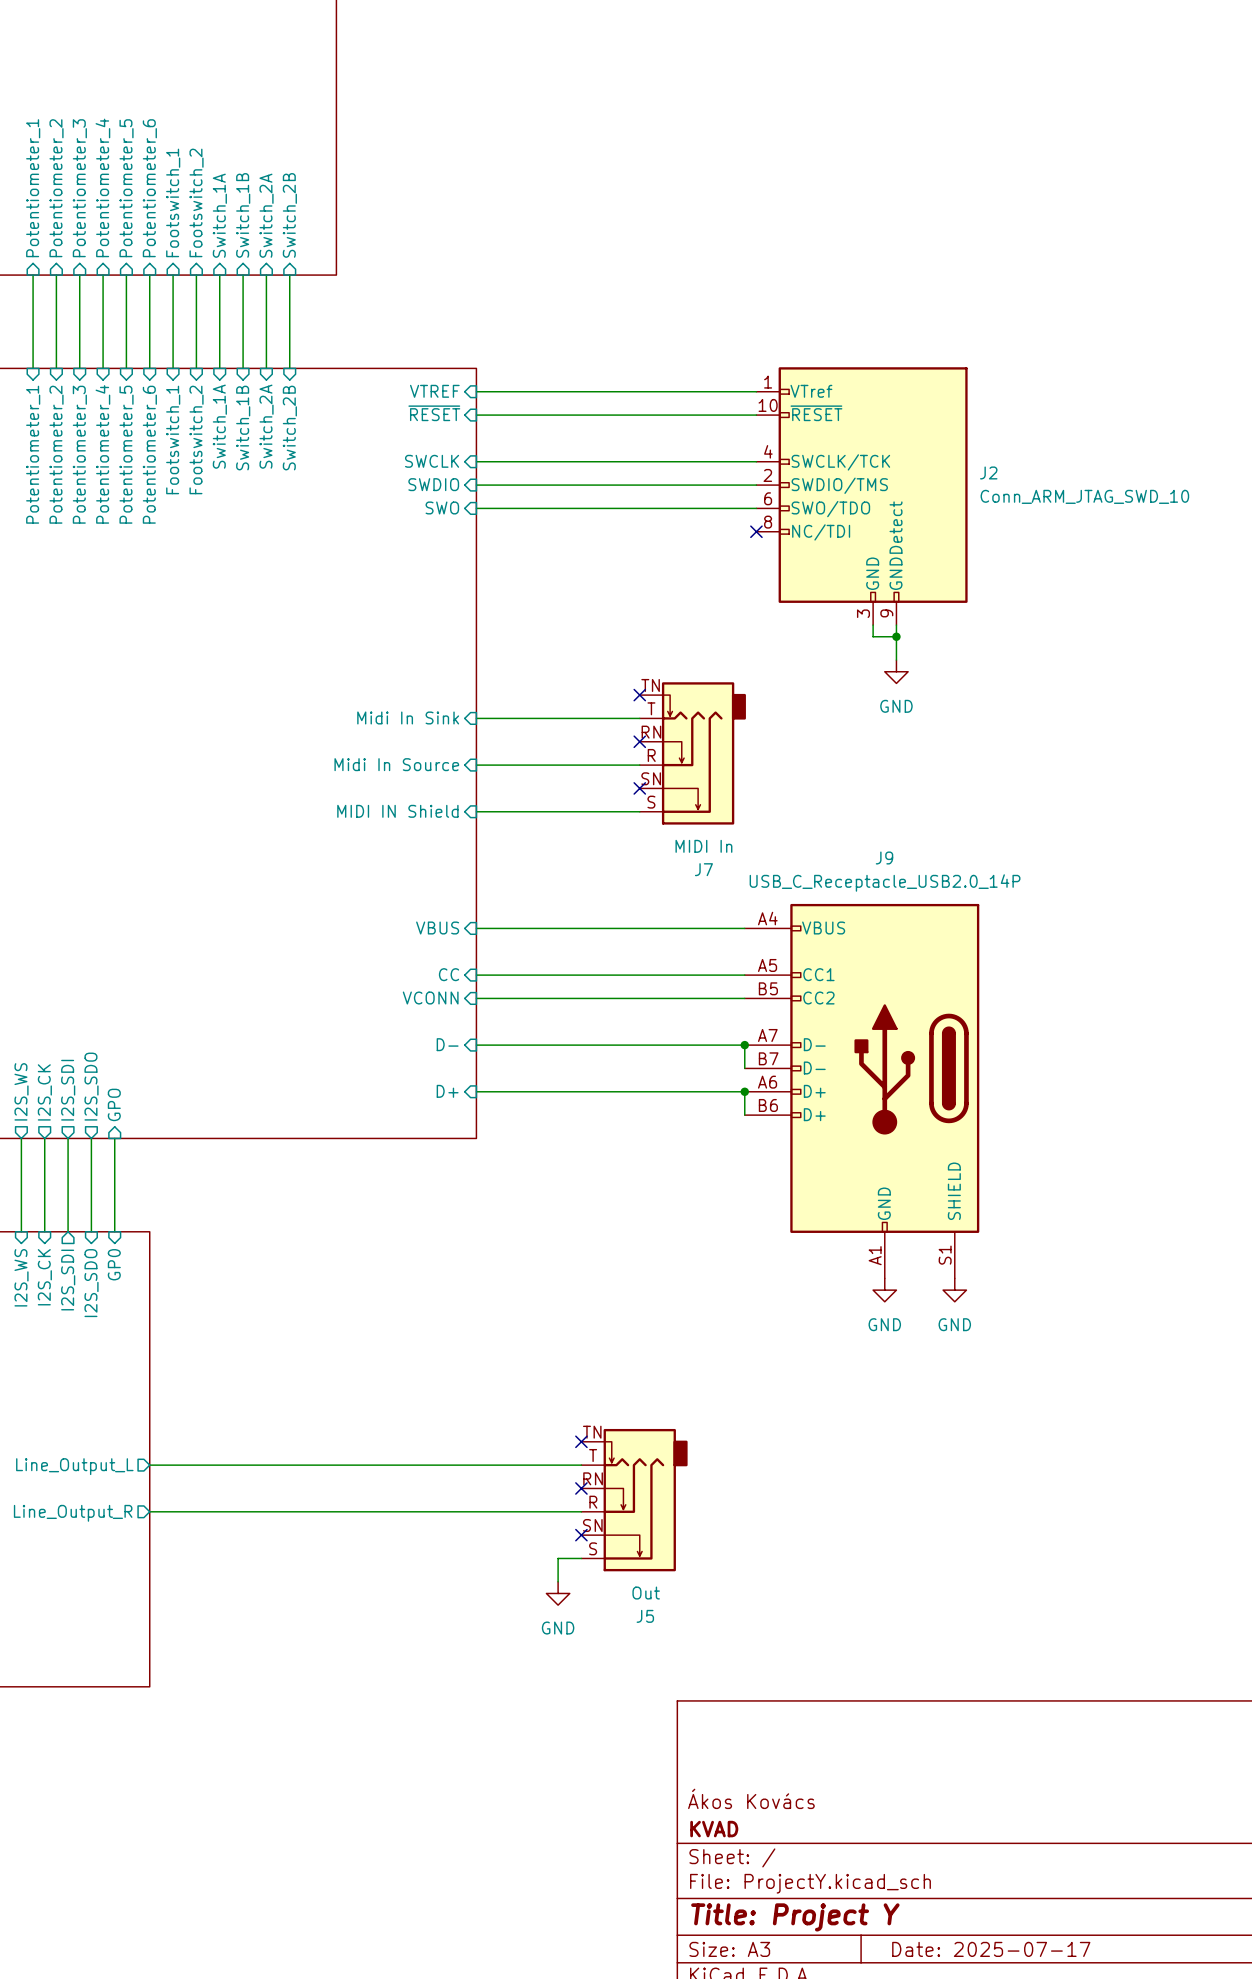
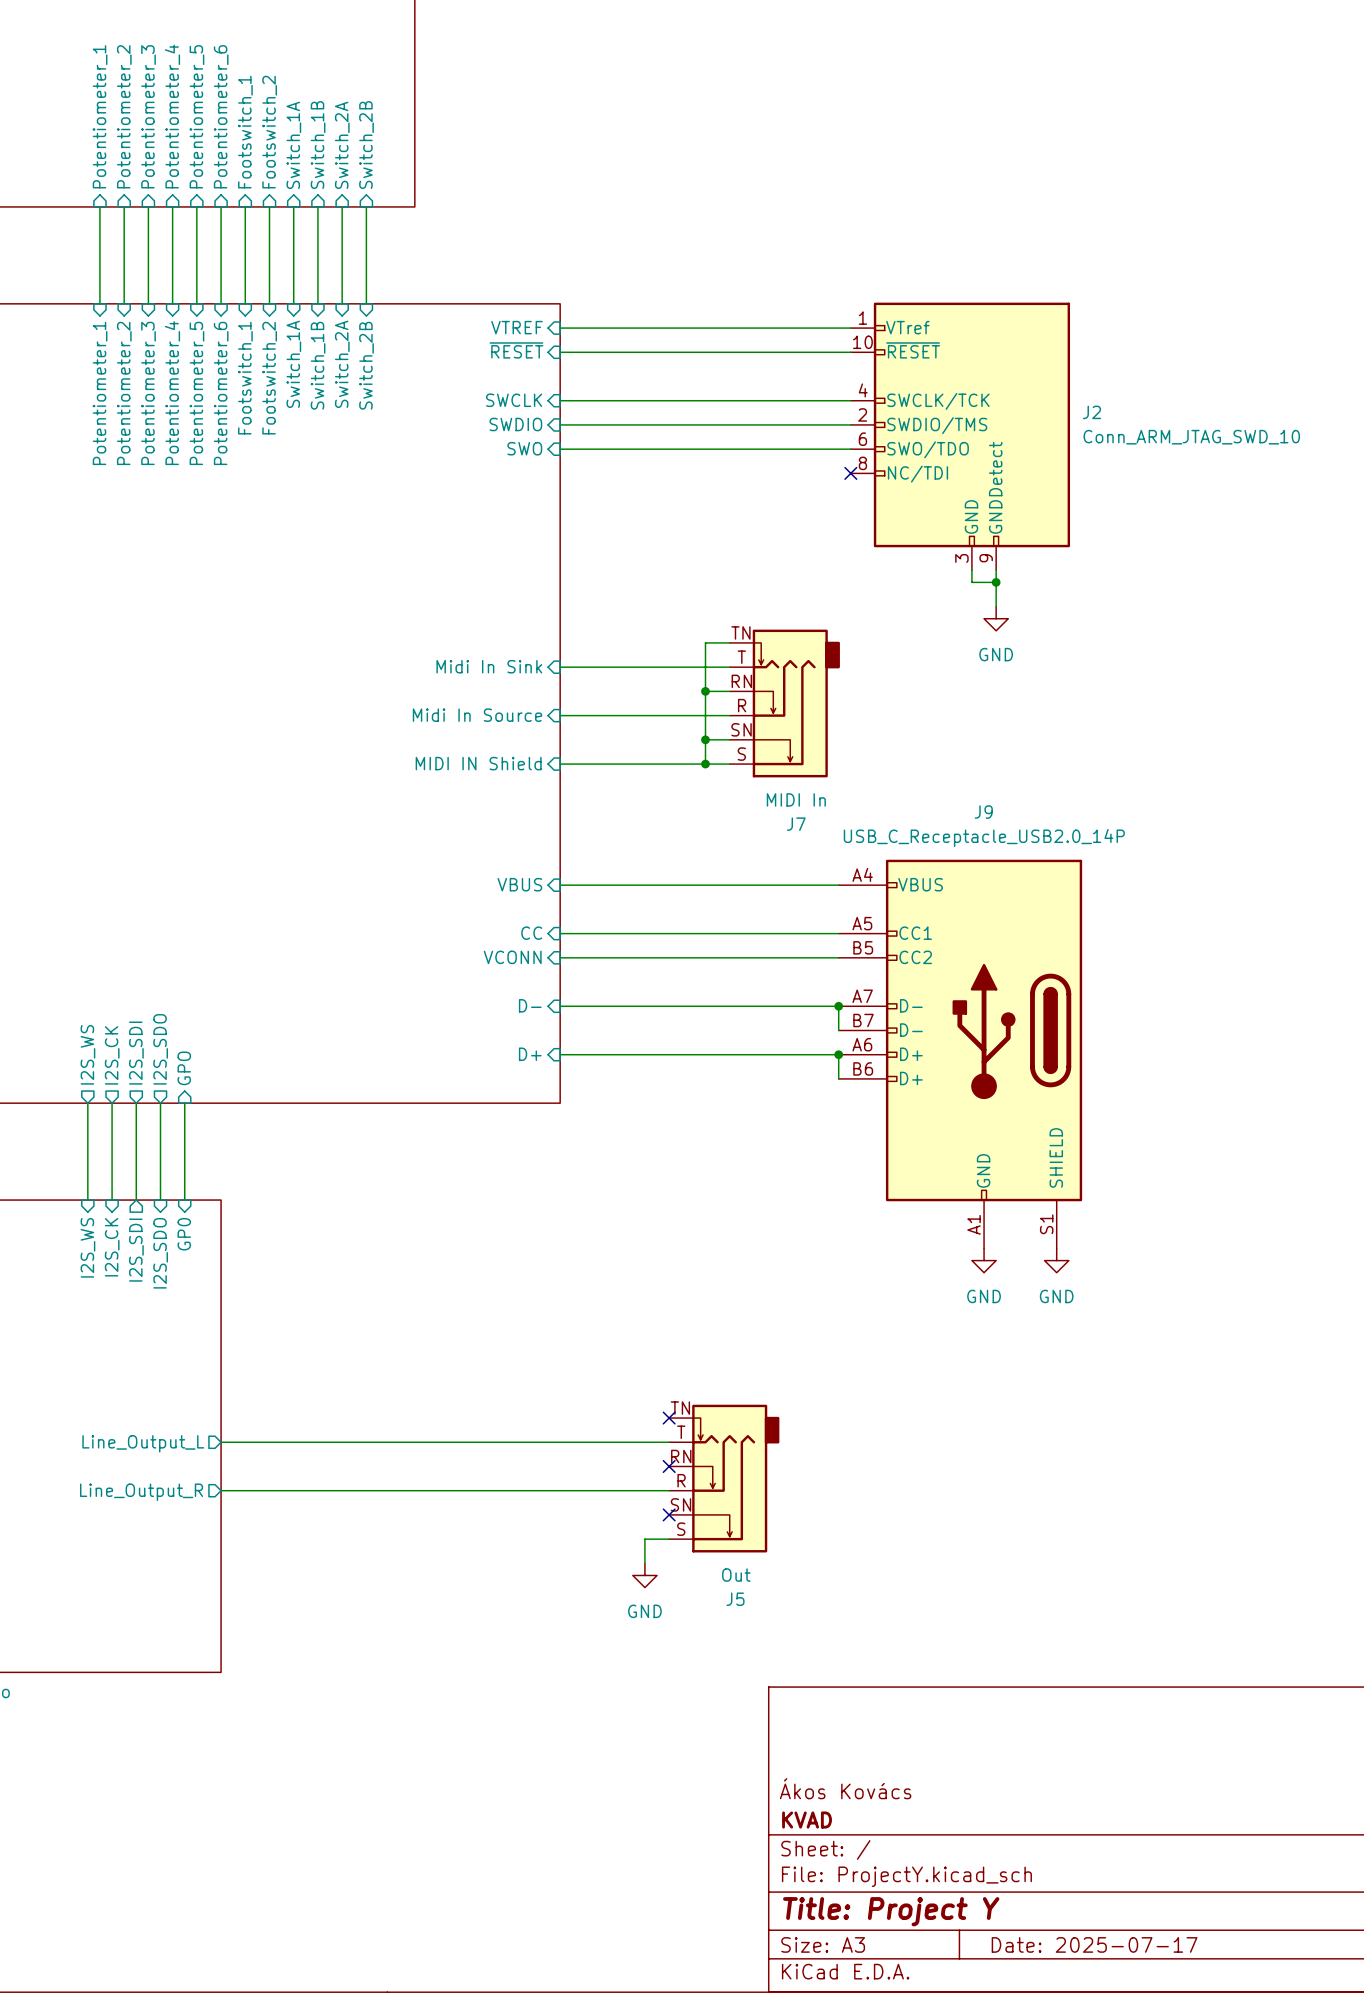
wire: none -> (729, 642) (705, 642) (705, 764)
no-connect mark: (639, 695) -> none
wire: none -> (705, 691) (729, 691)
junction: none -> (705, 691)
no-connect mark: (639, 741) -> none
wire: none -> (705, 739) (729, 739)
junction: none -> (705, 739)
no-connect mark: (639, 788) -> none
junction: none -> (705, 764)

